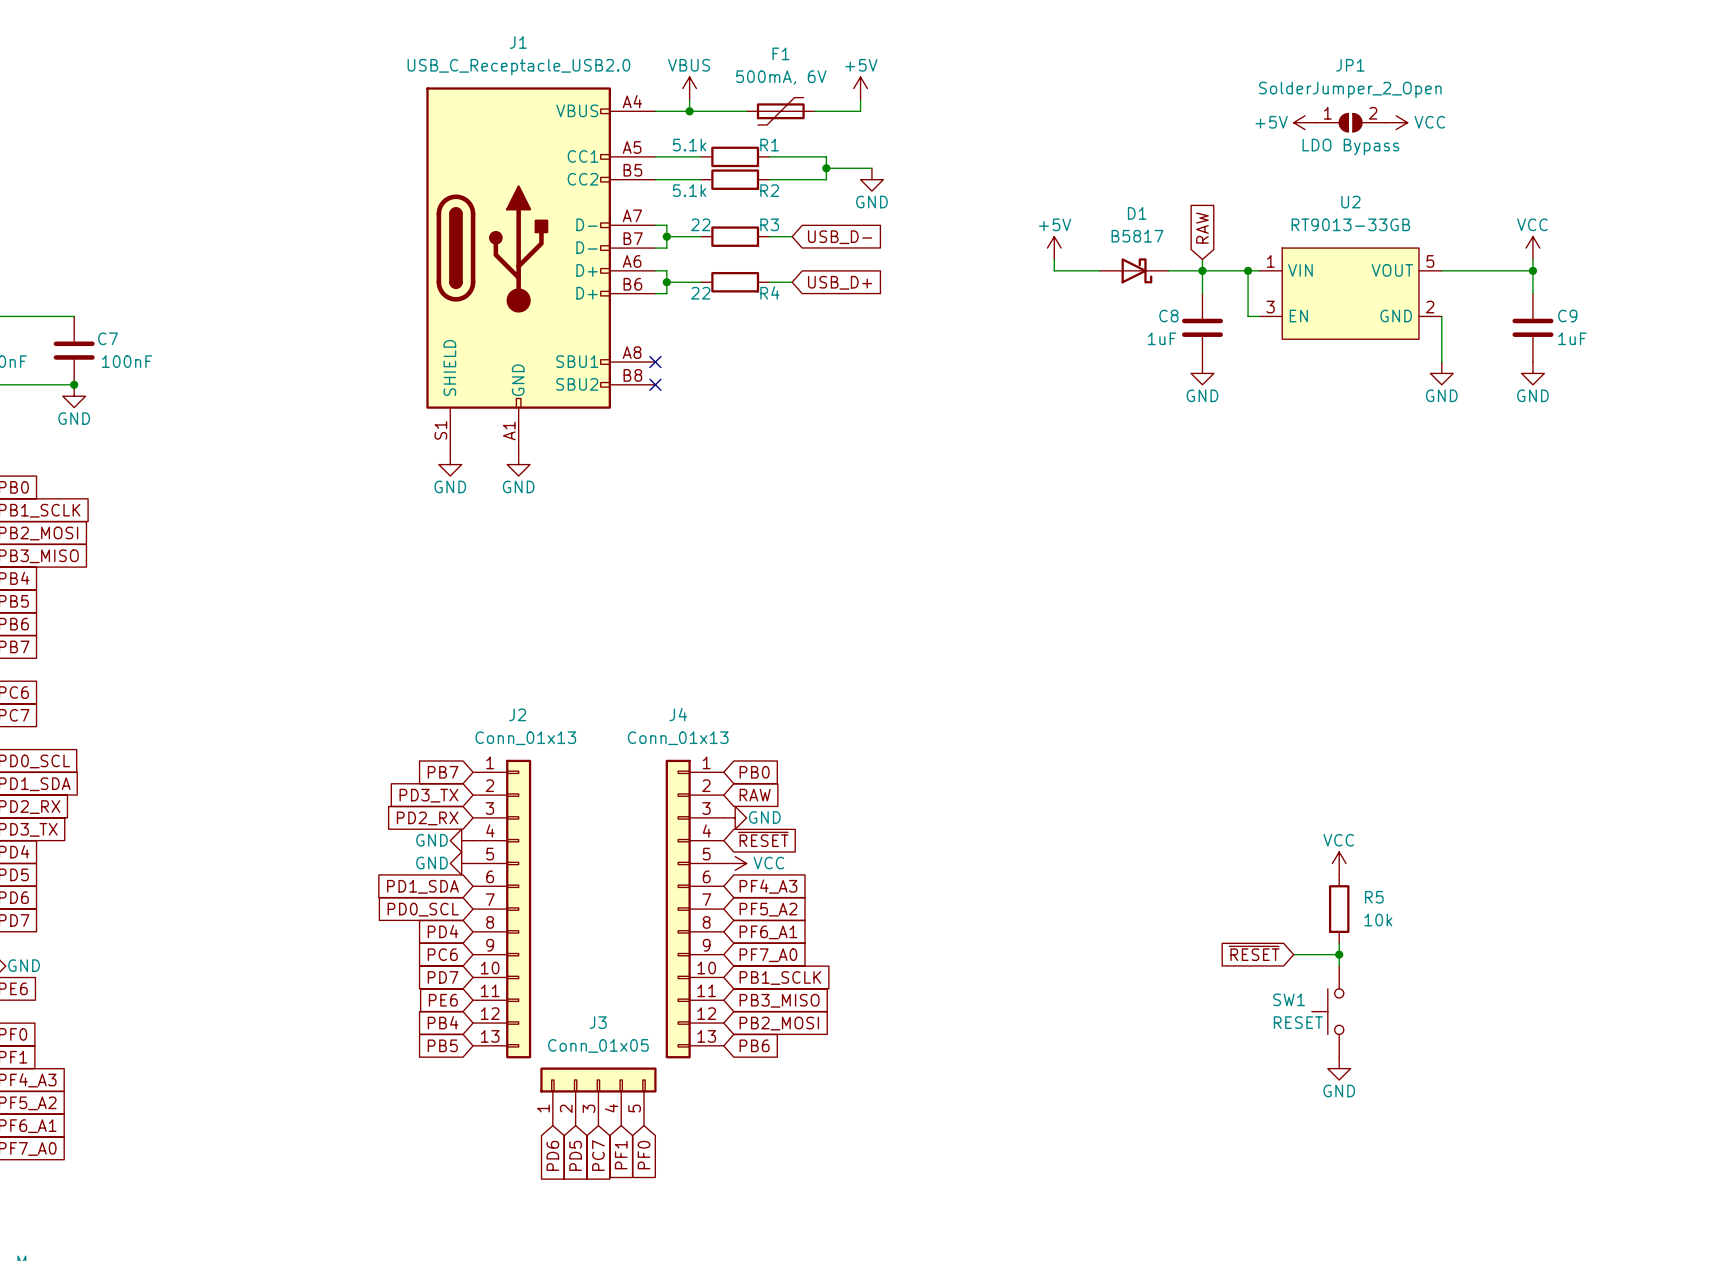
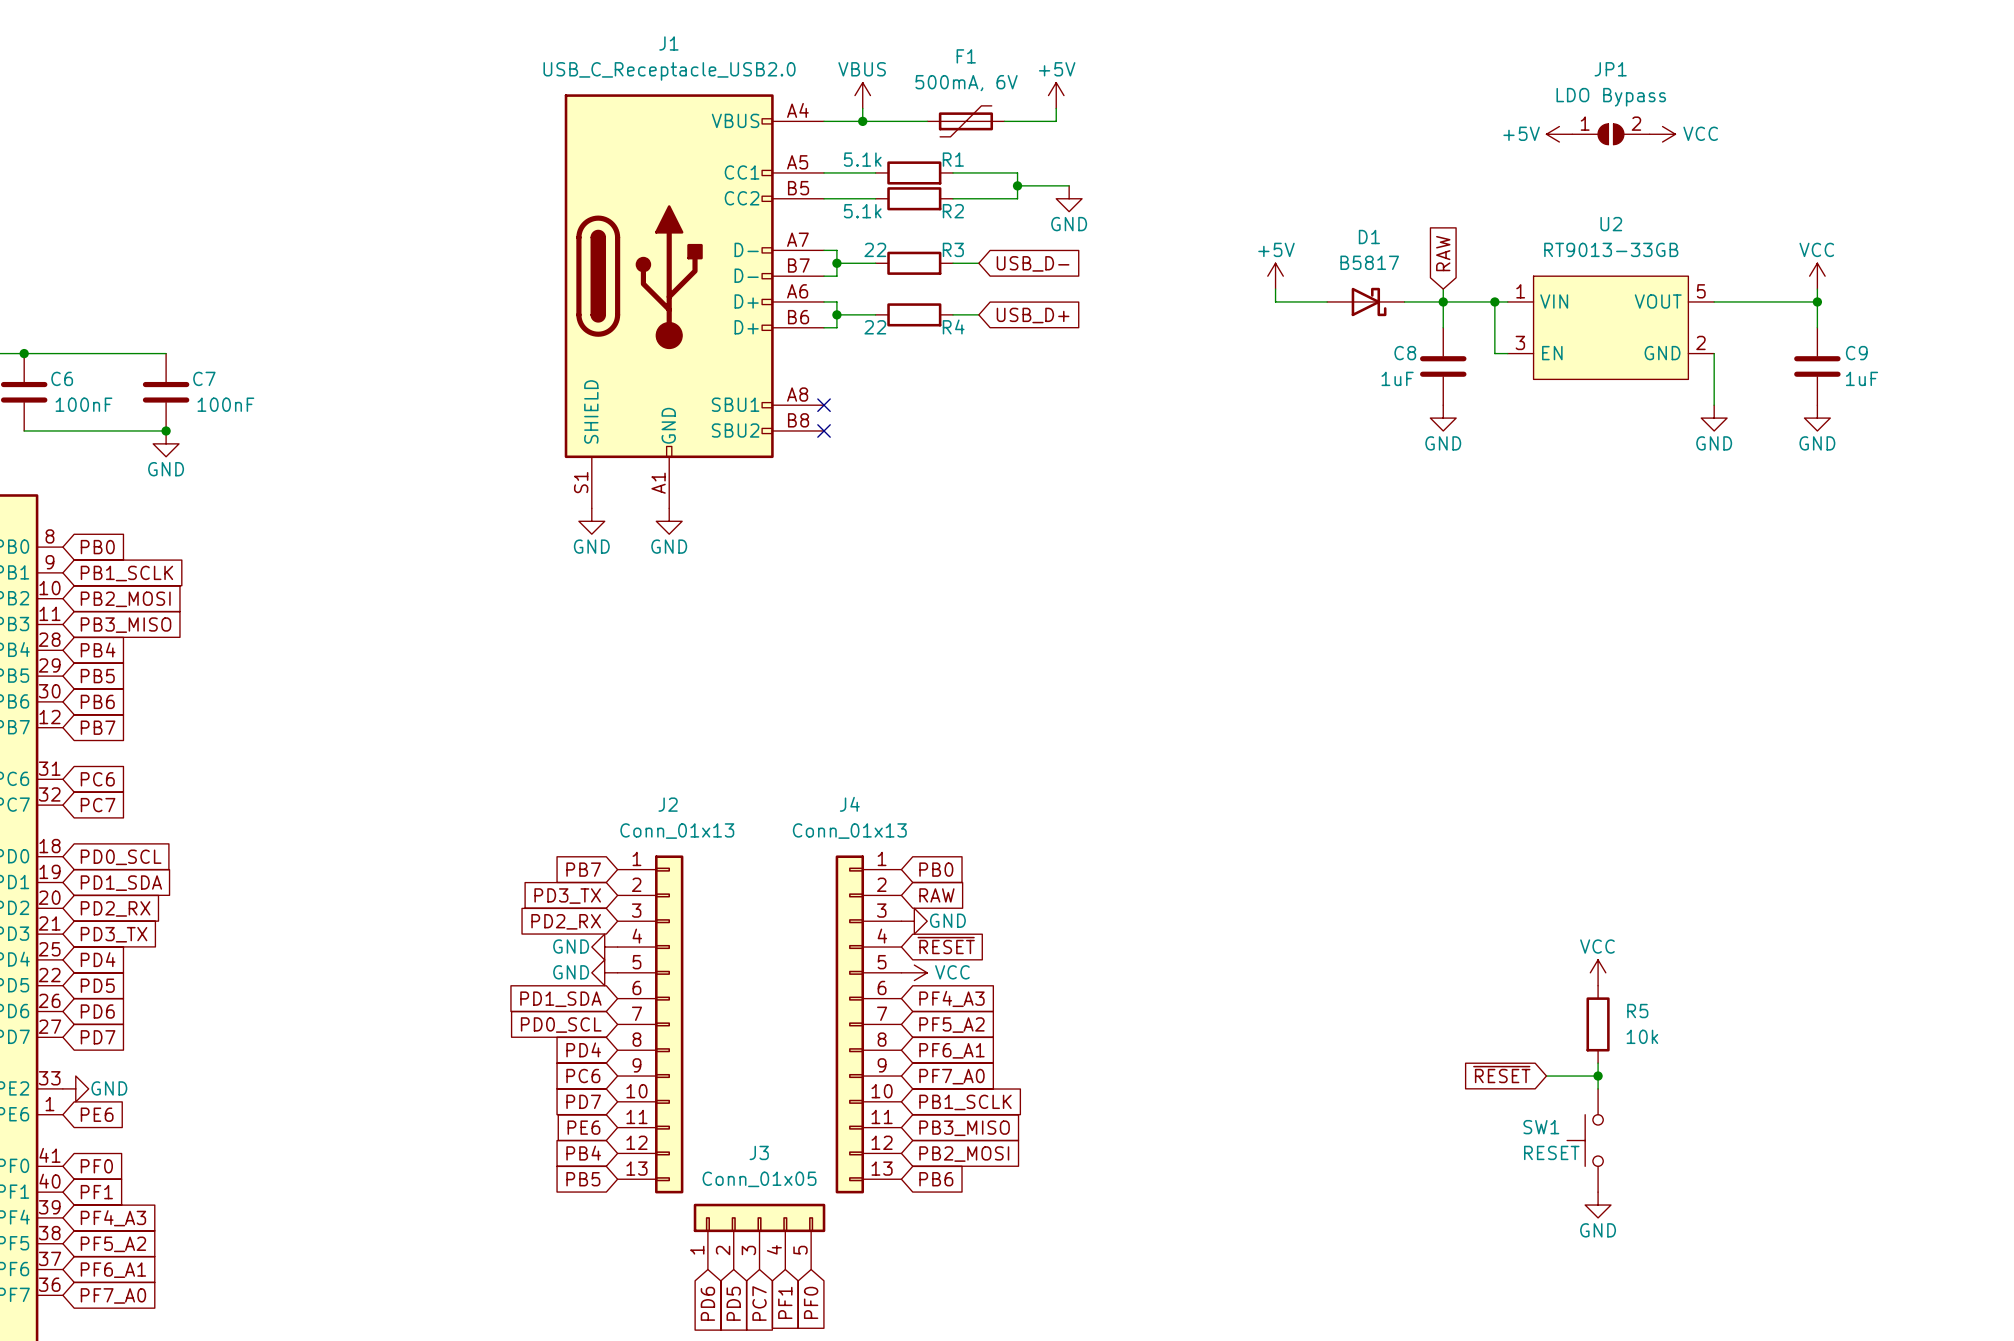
JP1 value: SolderJumper_2_Open (1350, 89) -> none
JP1 text position: LDO Bypass (1350, 146) -> LDO Bypass (1611, 97)

